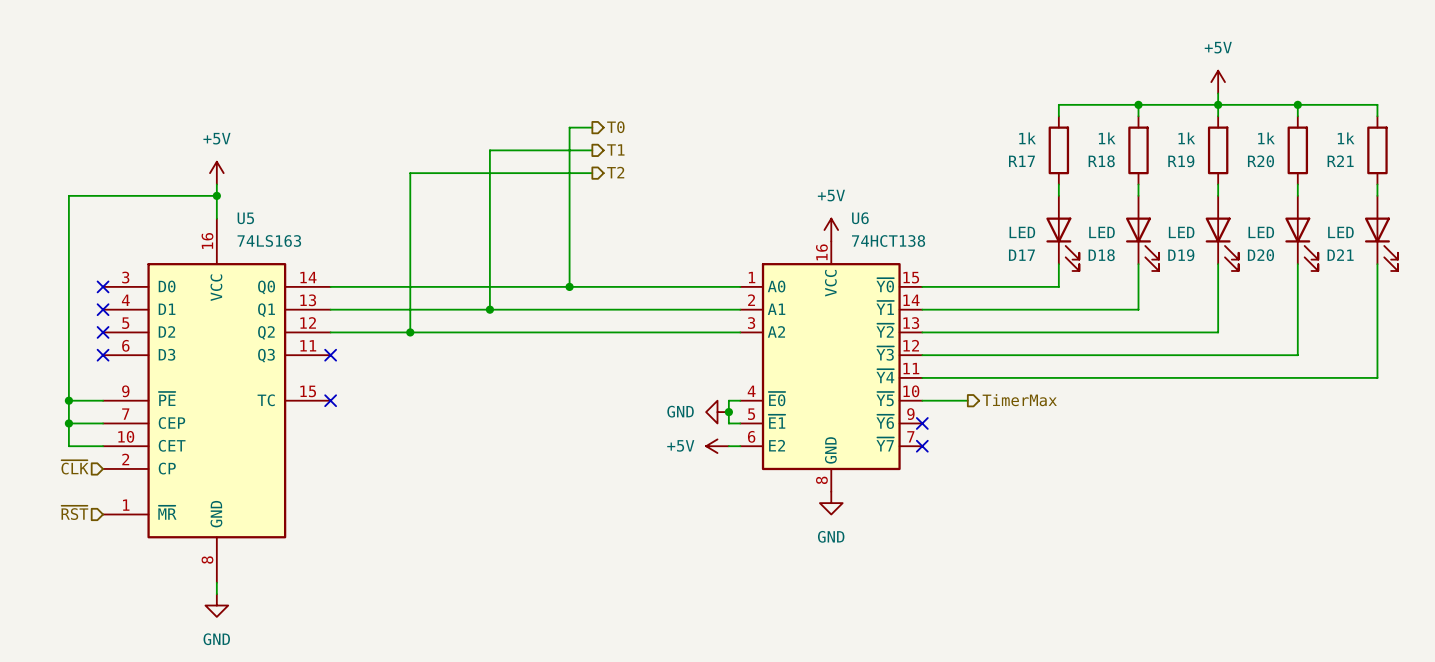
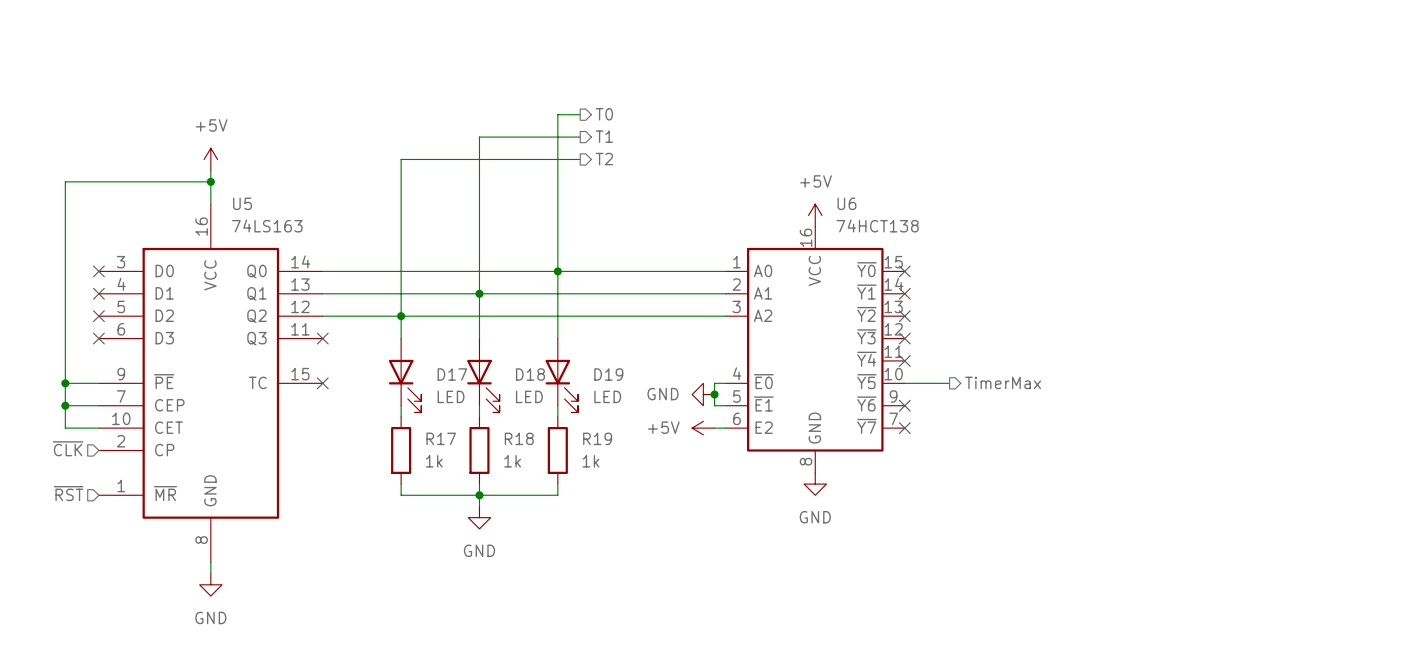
power symbol: +5V (1218, 82) -> none
wire: (1218, 93) (1218, 116) -> none
wire: (1138, 104) (1138, 116) -> none
junction: (1138, 104) -> none
junction: (1218, 104) -> none
wire: (1297, 104) (1297, 116) -> none
junction: (1297, 104) -> none
wire: (1058, 116) (1058, 104) (1377, 104) (1377, 116) -> none
R17 value position: 1k (1027, 138) -> 1k (434, 461)
R18 value position: 1k (1107, 138) -> 1k (512, 461)
R19 value position: 1k (1186, 138) -> 1k (590, 461)
R17 position: (1058, 150) -> (401, 450)
R18 position: (1138, 150) -> (479, 450)
R19 position: (1218, 150) -> (557, 450)
R20: 1k (1297, 150) -> none
R21: 1k (1377, 150) -> none
R17 name position: R17 (1021, 161) -> R17 (441, 438)
R18 name position: R18 (1101, 161) -> R18 (519, 438)
R19 name position: R19 (1181, 161) -> R19 (597, 438)
wire: (1058, 184) (1058, 195) -> none
wire: (1138, 184) (1138, 195) -> none
wire: (1218, 184) (1218, 195) -> none
wire: (1297, 184) (1297, 195) -> none
wire: (1377, 184) (1377, 195) -> none
D17 value position: LED (1022, 232) -> LED (451, 396)
D18 value position: LED (1101, 232) -> LED (529, 396)
D19 value position: LED (1181, 232) -> LED (607, 396)
D17 position: (1062, 233) -> (405, 375)
D18 position: (1142, 233) -> (483, 375)
D19 position: (1222, 233) -> (561, 375)
D20: LED (1301, 233) -> none
D21: LED (1381, 233) -> none
D17 name position: D17 (1021, 255) -> D17 (452, 374)
D18 name position: D18 (1101, 255) -> D18 (530, 374)
D19 name position: D19 (1181, 255) -> D19 (608, 374)
wire: (1058, 264) (1058, 286) (922, 286) -> none
wire: (1138, 264) (1138, 309) (922, 309) -> none
wire: (1218, 264) (1218, 332) (922, 332) -> none
wire: (1297, 264) (1297, 355) (922, 355) -> none
wire: (1377, 264) (1377, 377) (922, 377) -> none
wire: none -> (557, 271) (557, 338)
no-connect mark: none -> (904, 271)
wire: none -> (479, 293) (479, 338)
no-connect mark: none -> (904, 293)
wire: none -> (401, 316) (401, 338)
no-connect mark: none -> (904, 316)
no-connect mark: none -> (904, 338)
no-connect mark: none -> (904, 360)
wire: none -> (401, 405) (401, 416)
wire: none -> (479, 405) (479, 416)
wire: none -> (557, 405) (557, 416)
wire: none -> (401, 484) (401, 495) (557, 495) (557, 484)
wire: none -> (479, 484) (479, 506)
junction: none -> (479, 495)
power symbol: none -> GND (479, 517)

